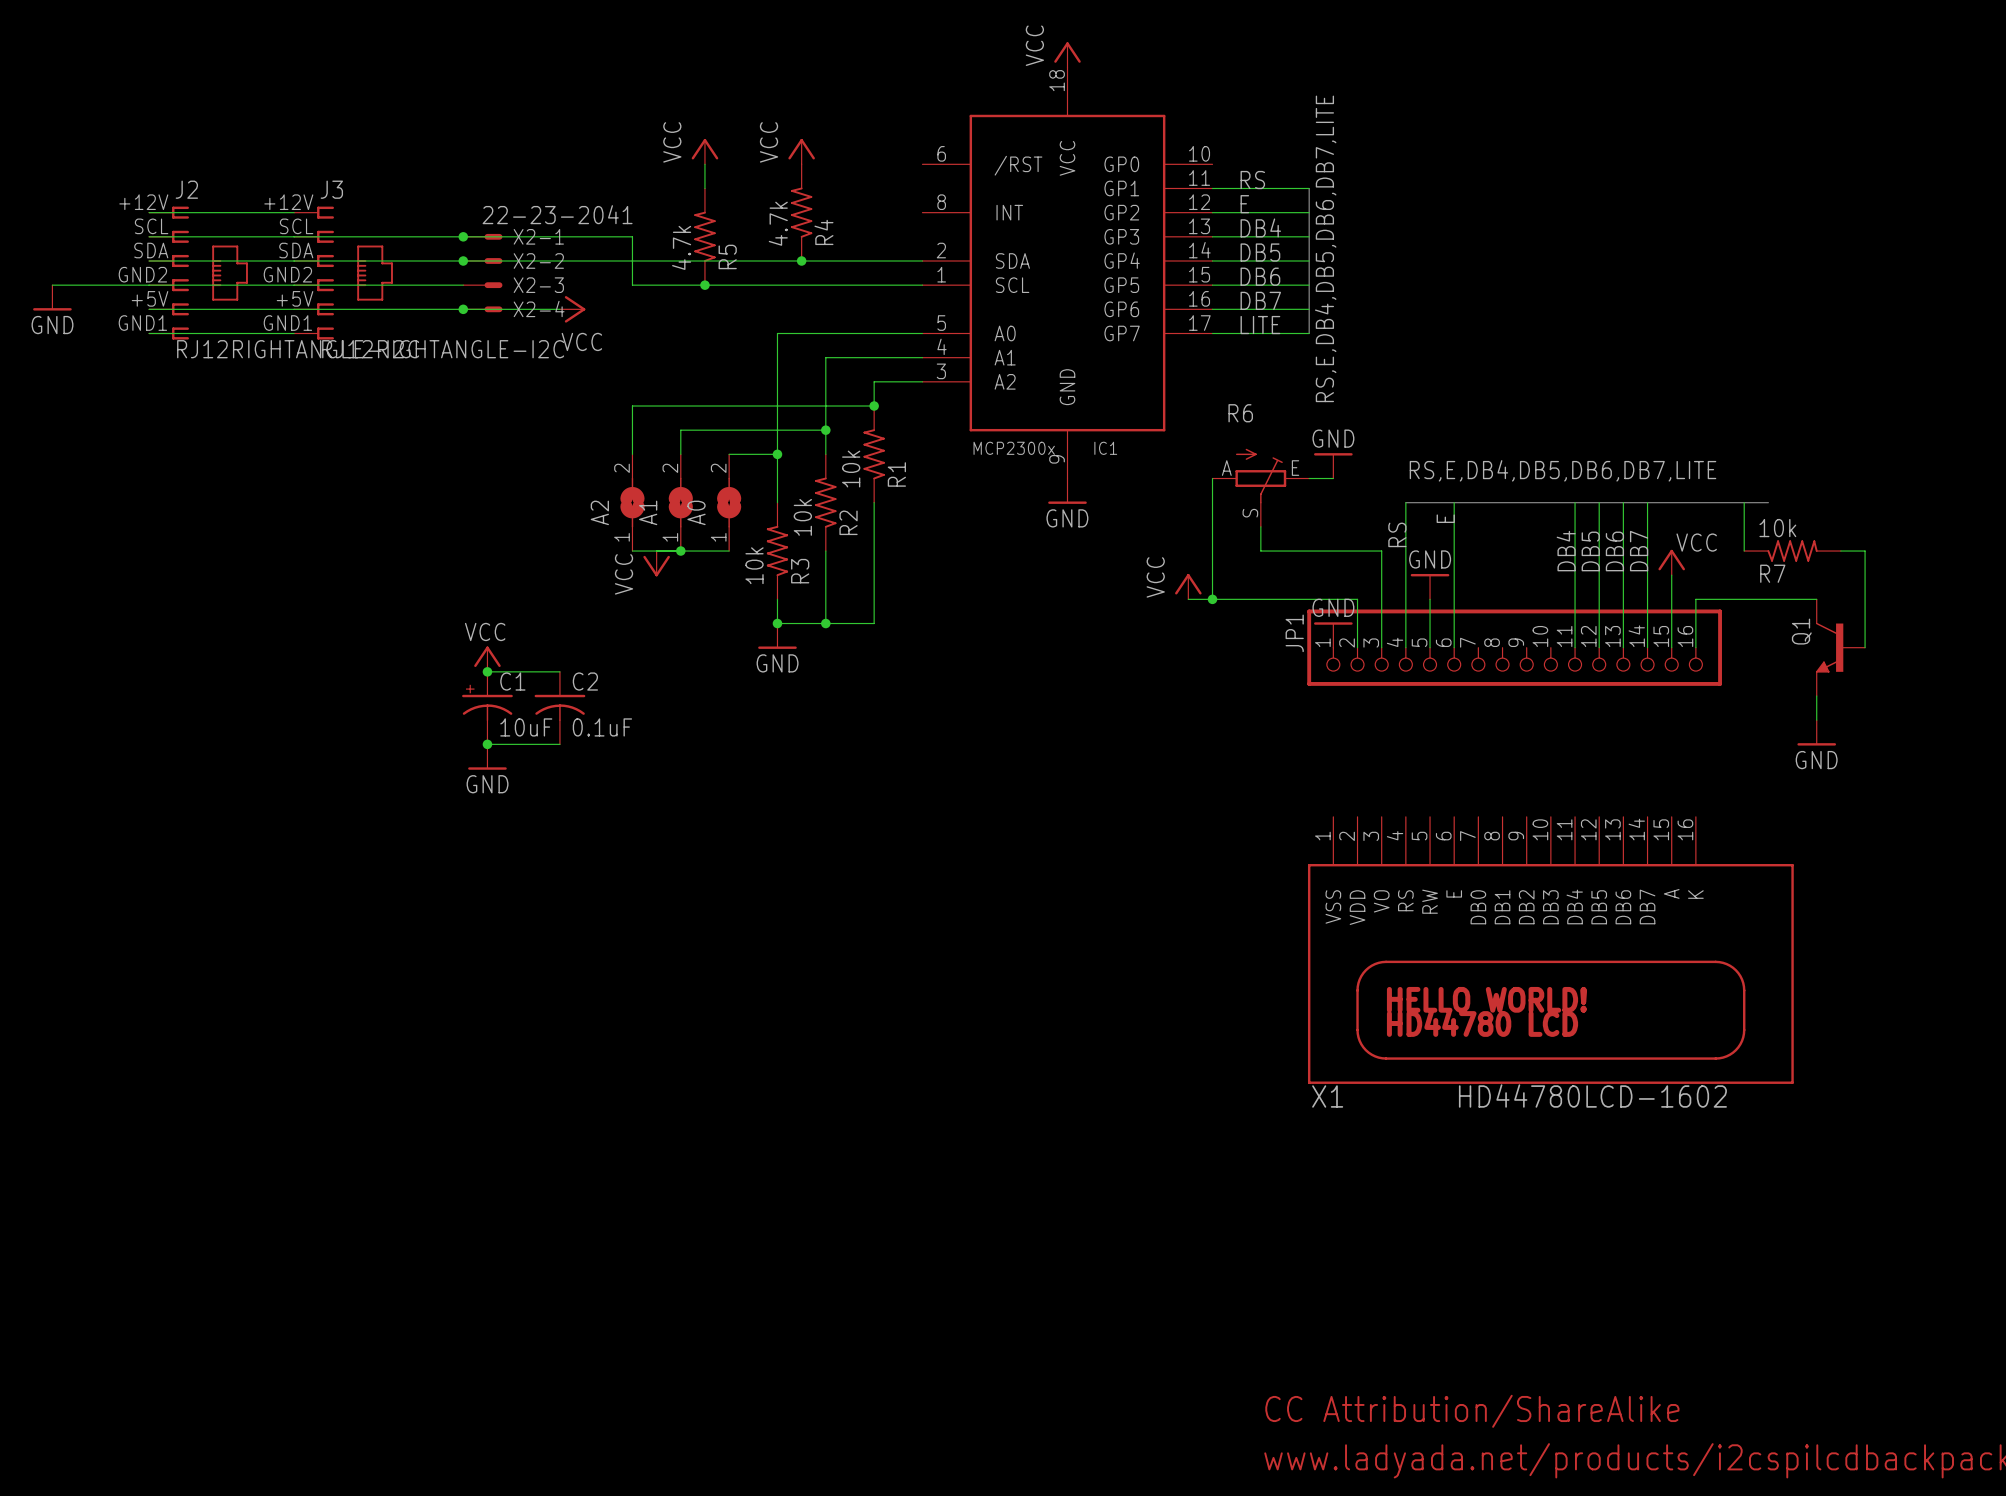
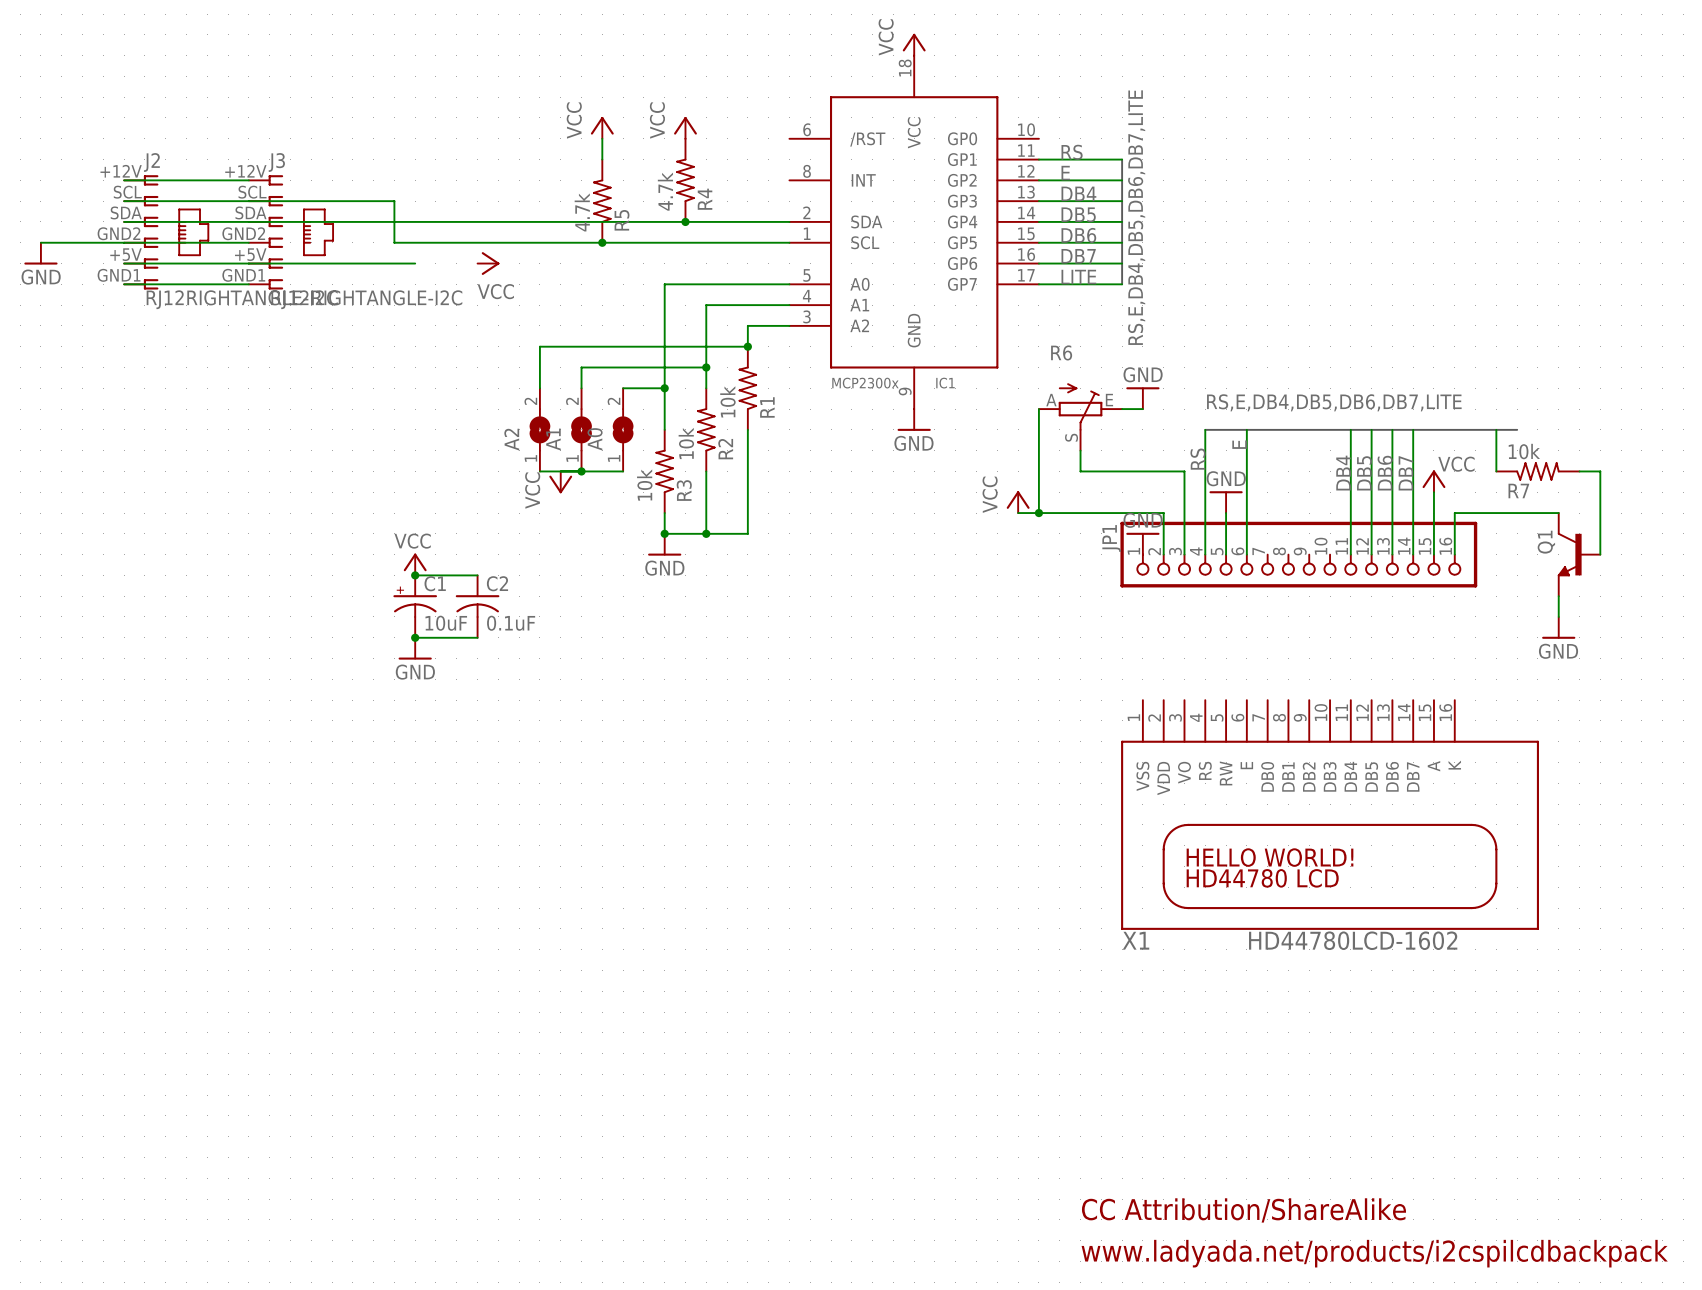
wire: (463, 236) (632, 236) (632, 285) -> (394, 201) (394, 242) (539, 242)
junction: (463, 236) -> none
X2-1: 22-23-2041 (482, 236) -> none
junction: (463, 260) -> none
X2-2: (482, 260) -> none
wire: (294, 285) (463, 285) -> none
X2-3: (482, 285) -> none
junction: (463, 309) -> none
X2-4: (482, 309) -> none
wire: (487, 309) (559, 309) -> none

